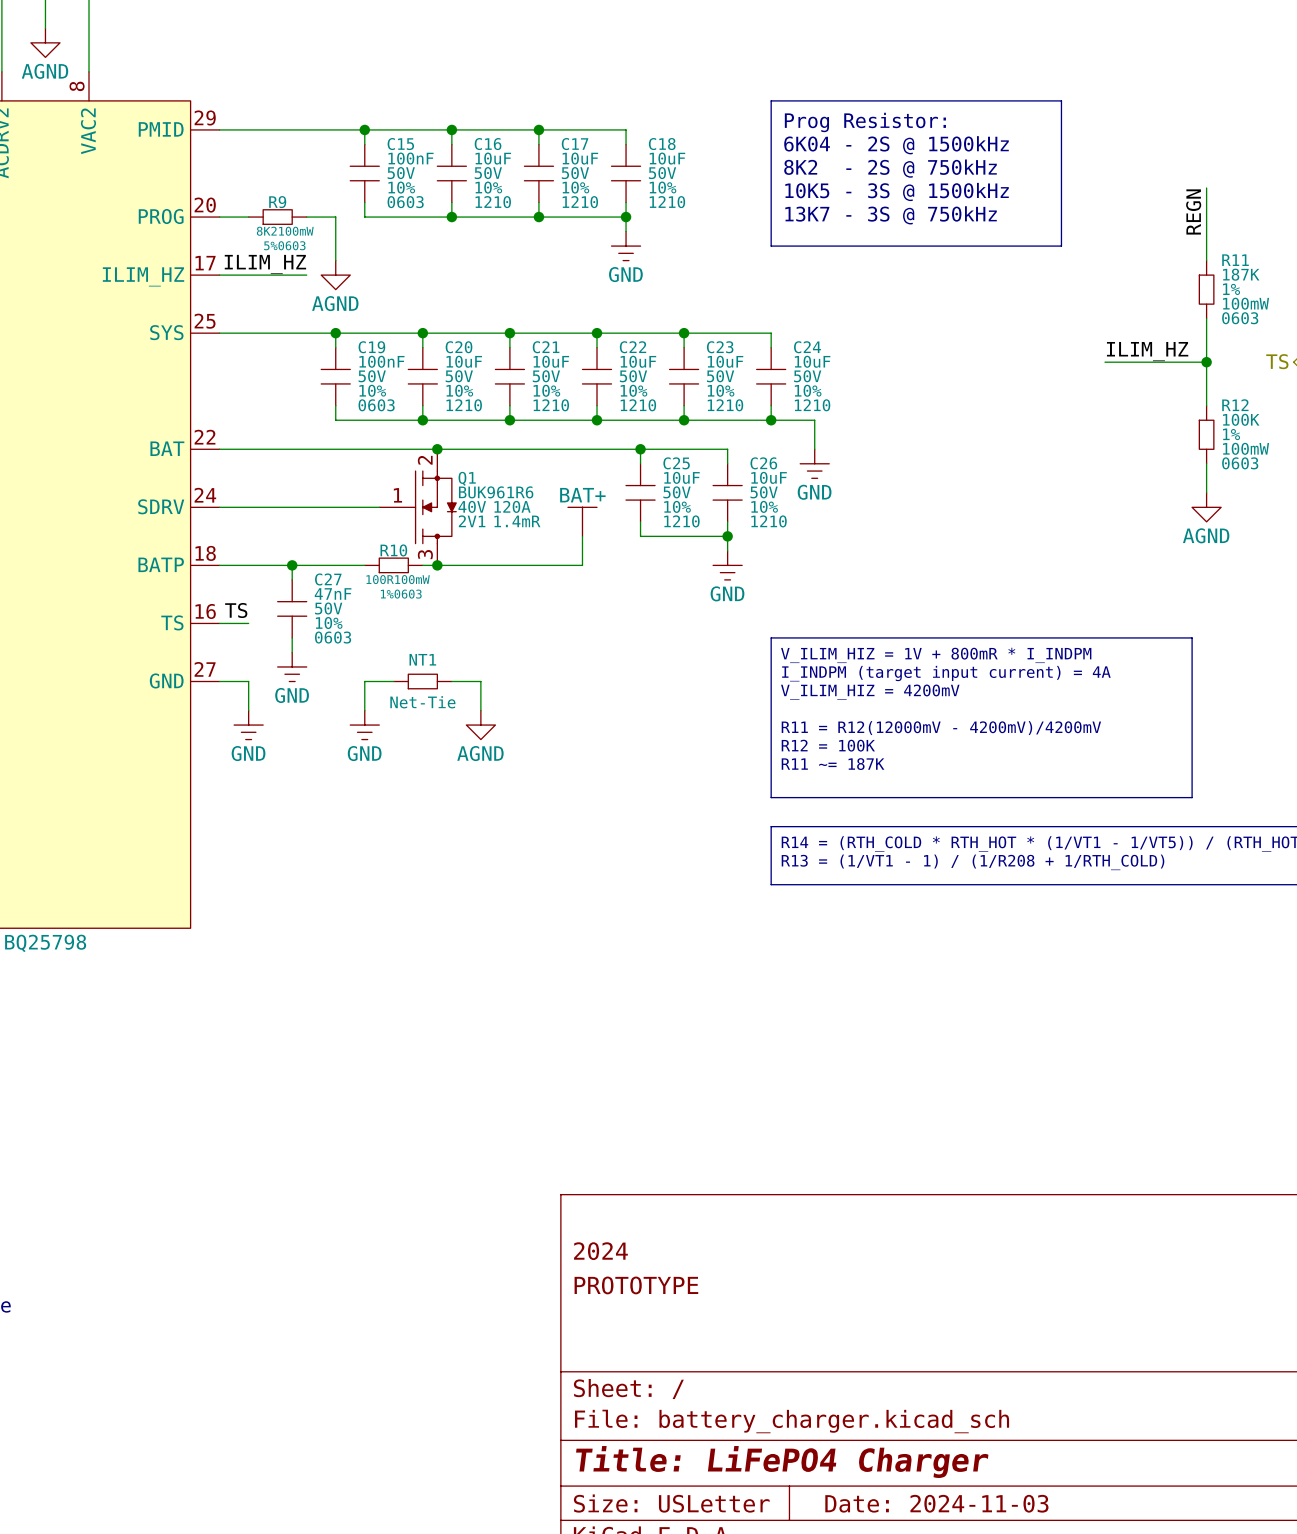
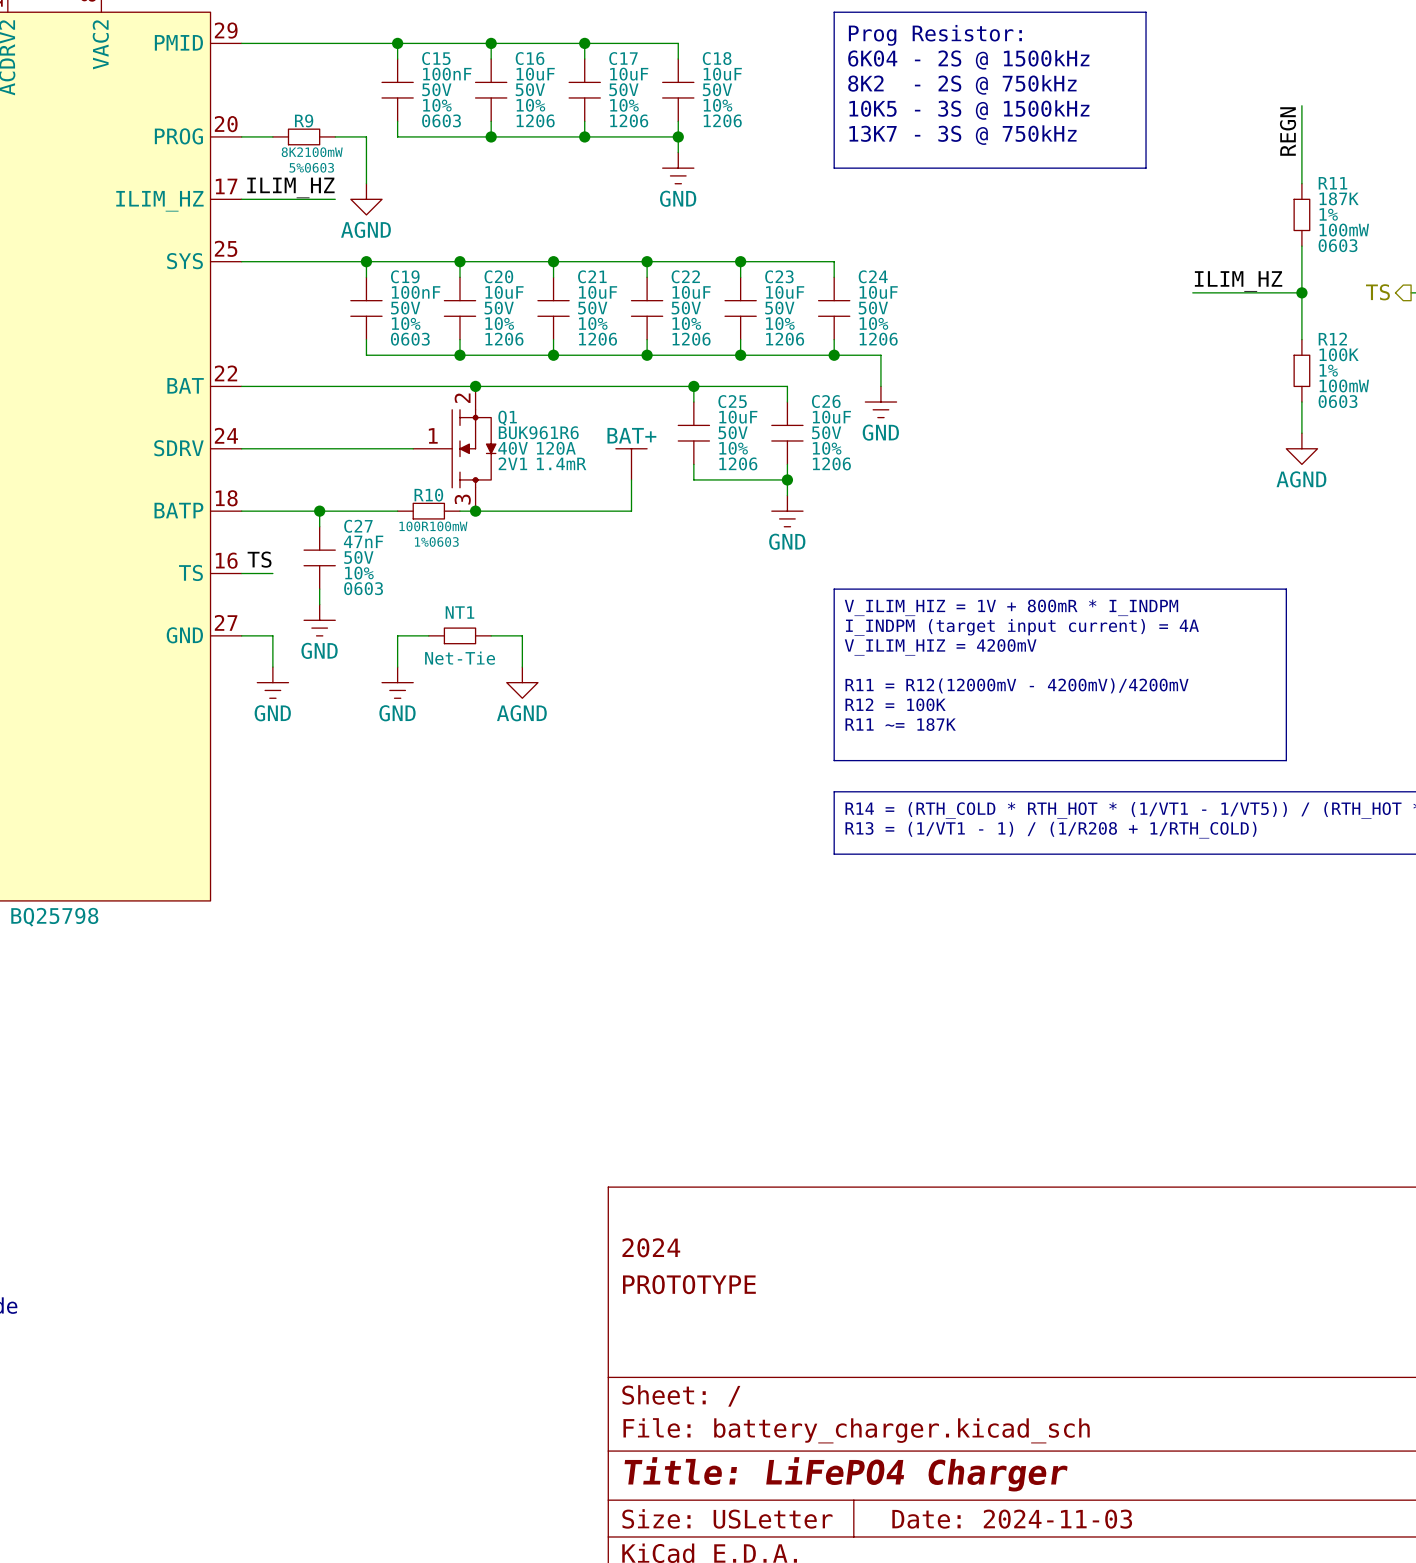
C16 text: 1210 (493, 202) -> 1206 (535, 120)
C17 text: 1210 (580, 202) -> 1206 (629, 120)
C18 text: 1210 (667, 202) -> 1206 (722, 120)
C20 text: 1210 (464, 405) -> 1206 (504, 339)
C21 text: 1210 (551, 405) -> 1206 (598, 339)
C22 text: 1210 (638, 405) -> 1206 (691, 339)
C23 text: 1210 (725, 405) -> 1206 (785, 339)
C24 text: 1210 (812, 405) -> 1206 (878, 339)
C25 text: 1210 (681, 521) -> 1206 (738, 463)
C26 text: 1210 (769, 521) -> 1206 (831, 463)

